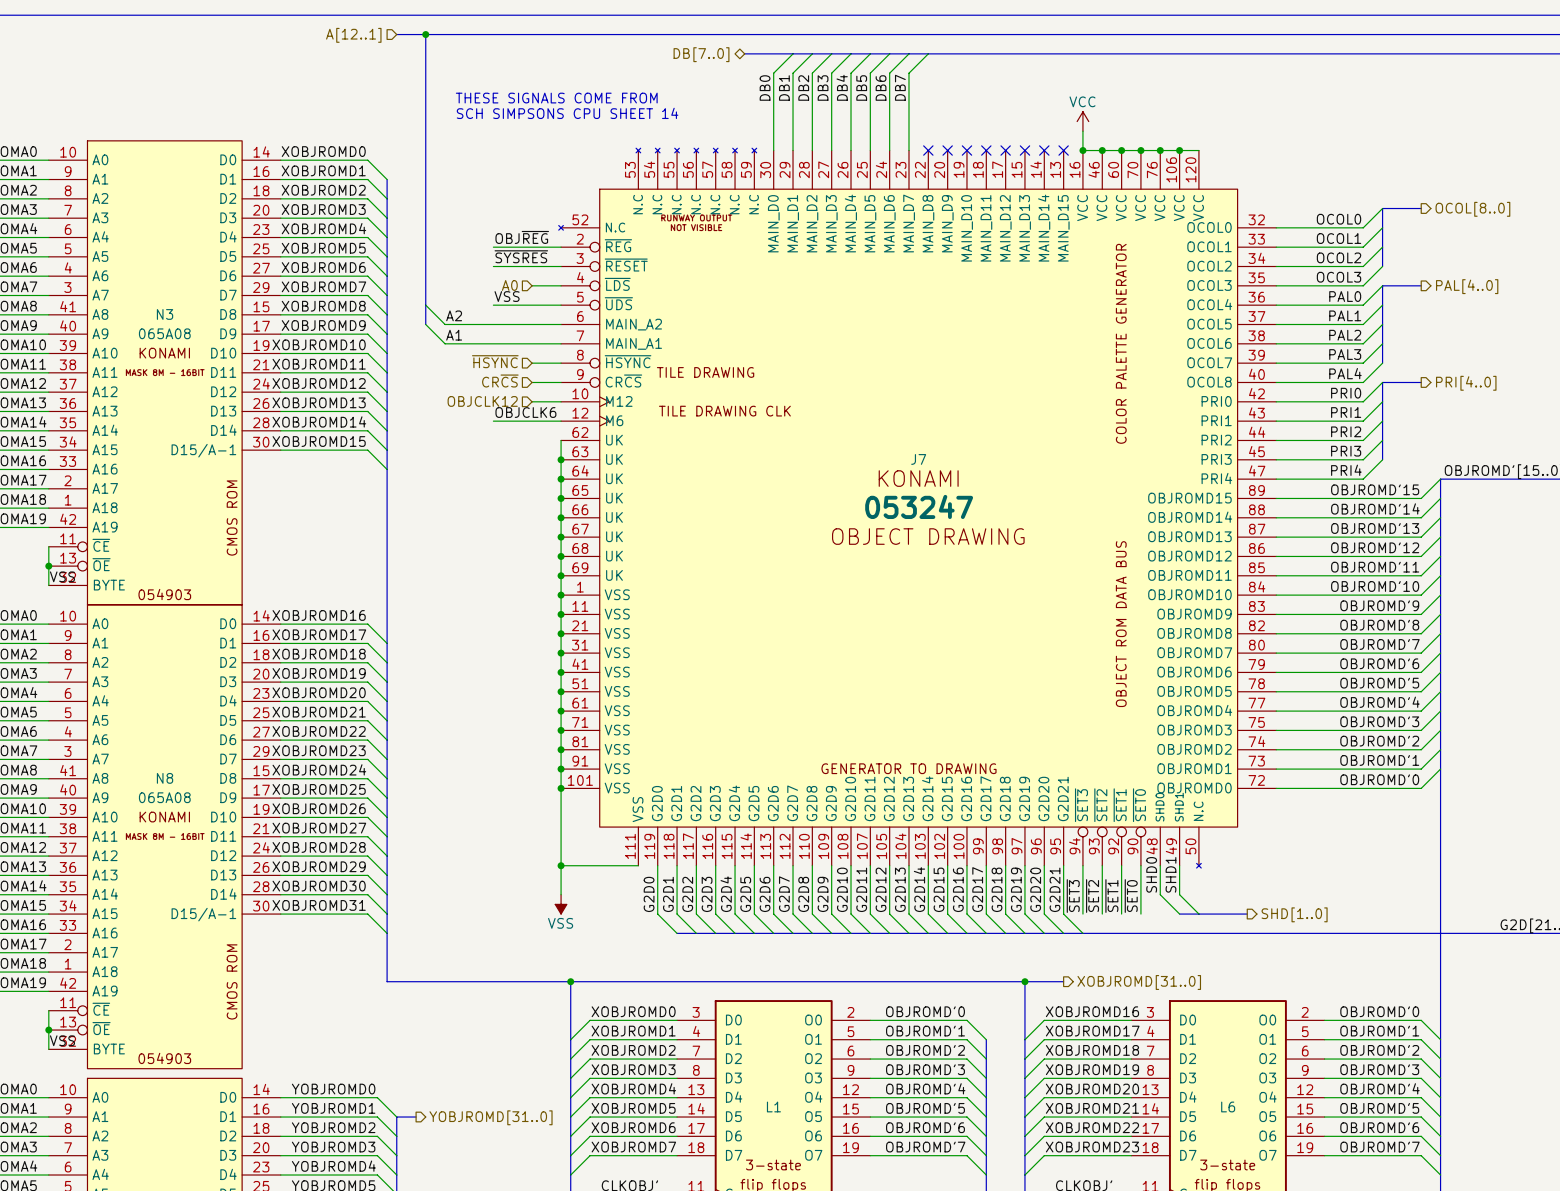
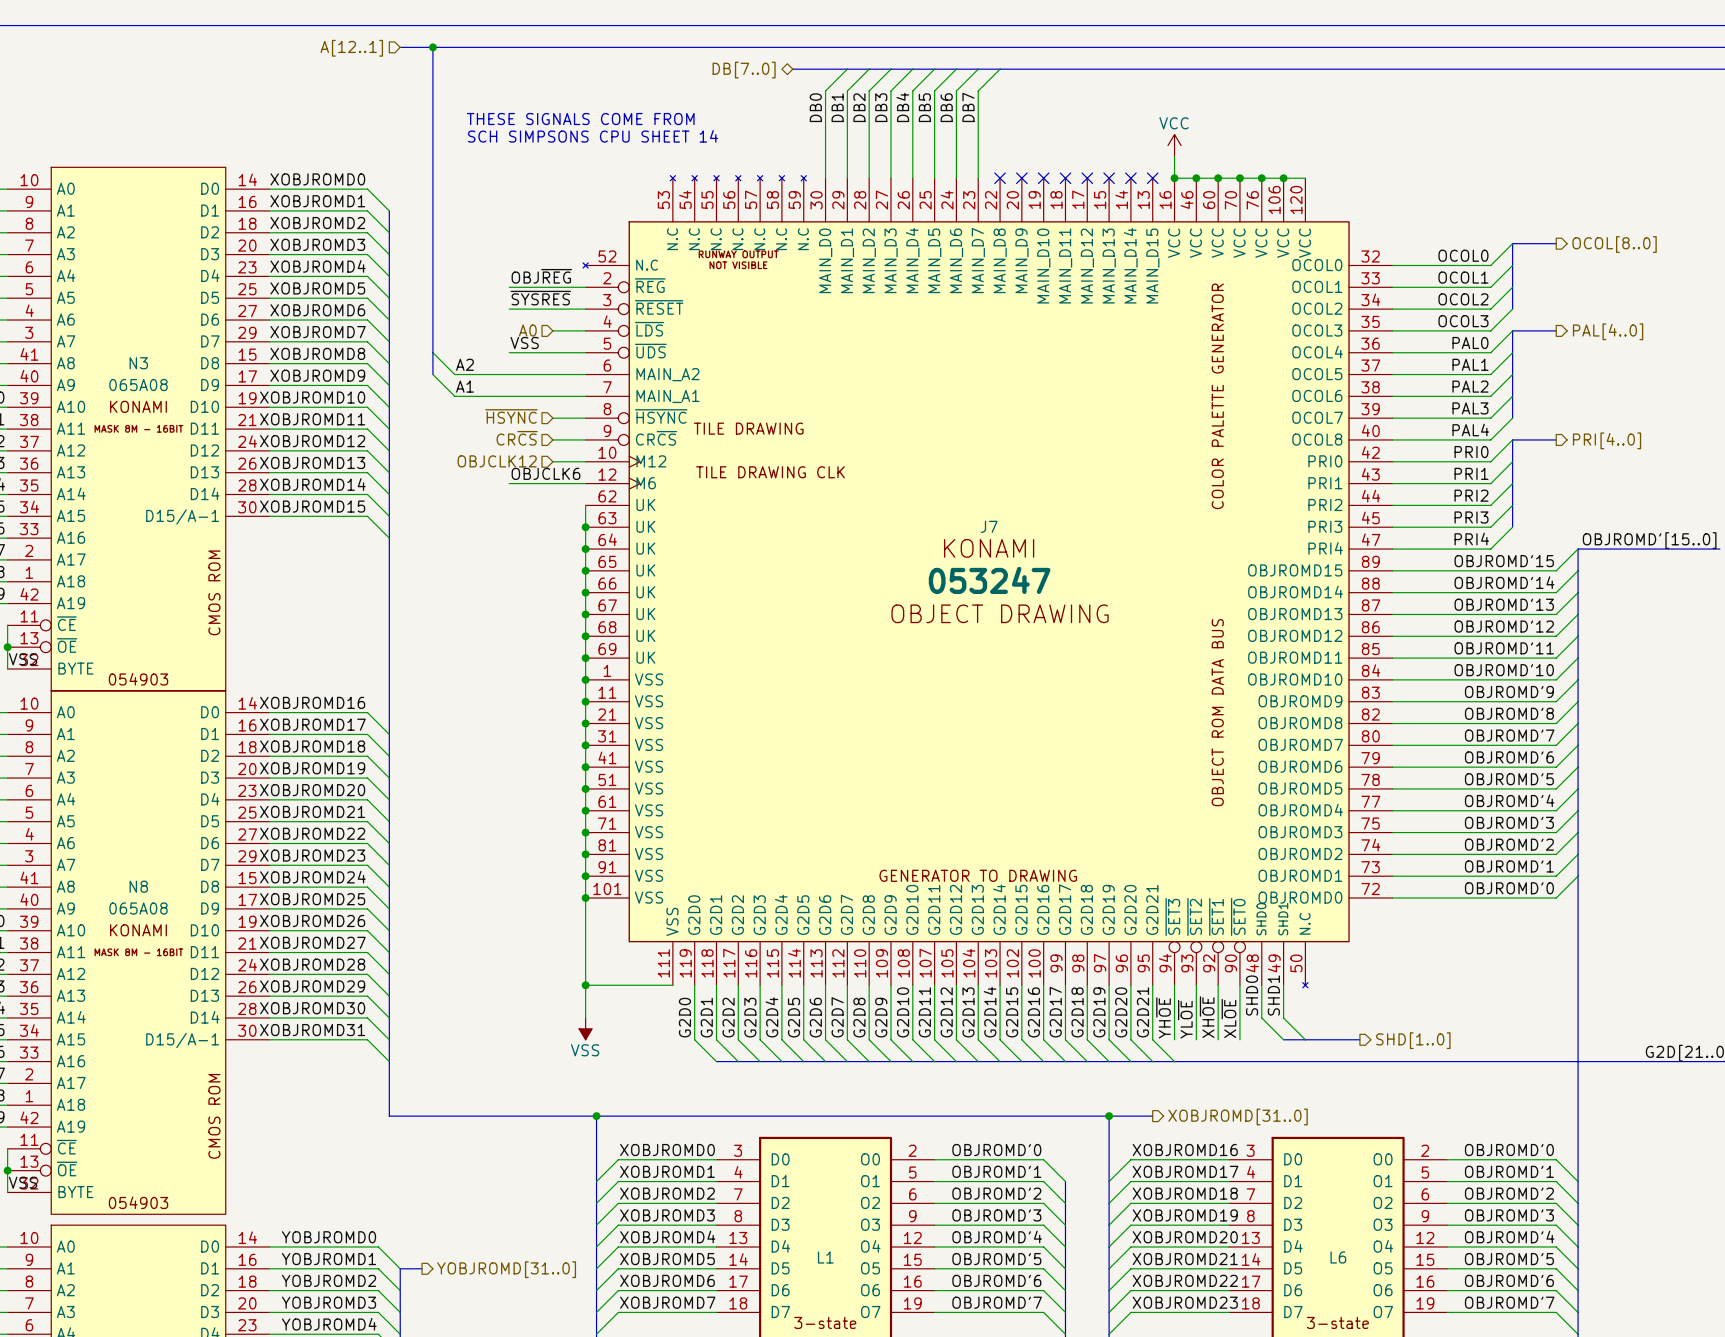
label: ~{SET3} (1073, 896) -> YH~{OE} (1163, 1017)
label: ~{SET2} (1092, 896) -> YL~{OE} (1185, 1019)
label: ~{SET1} (1111, 896) -> XH~{OE} (1207, 1017)
label: ~{SET0} (1131, 896) -> XL~{OE} (1228, 1018)

